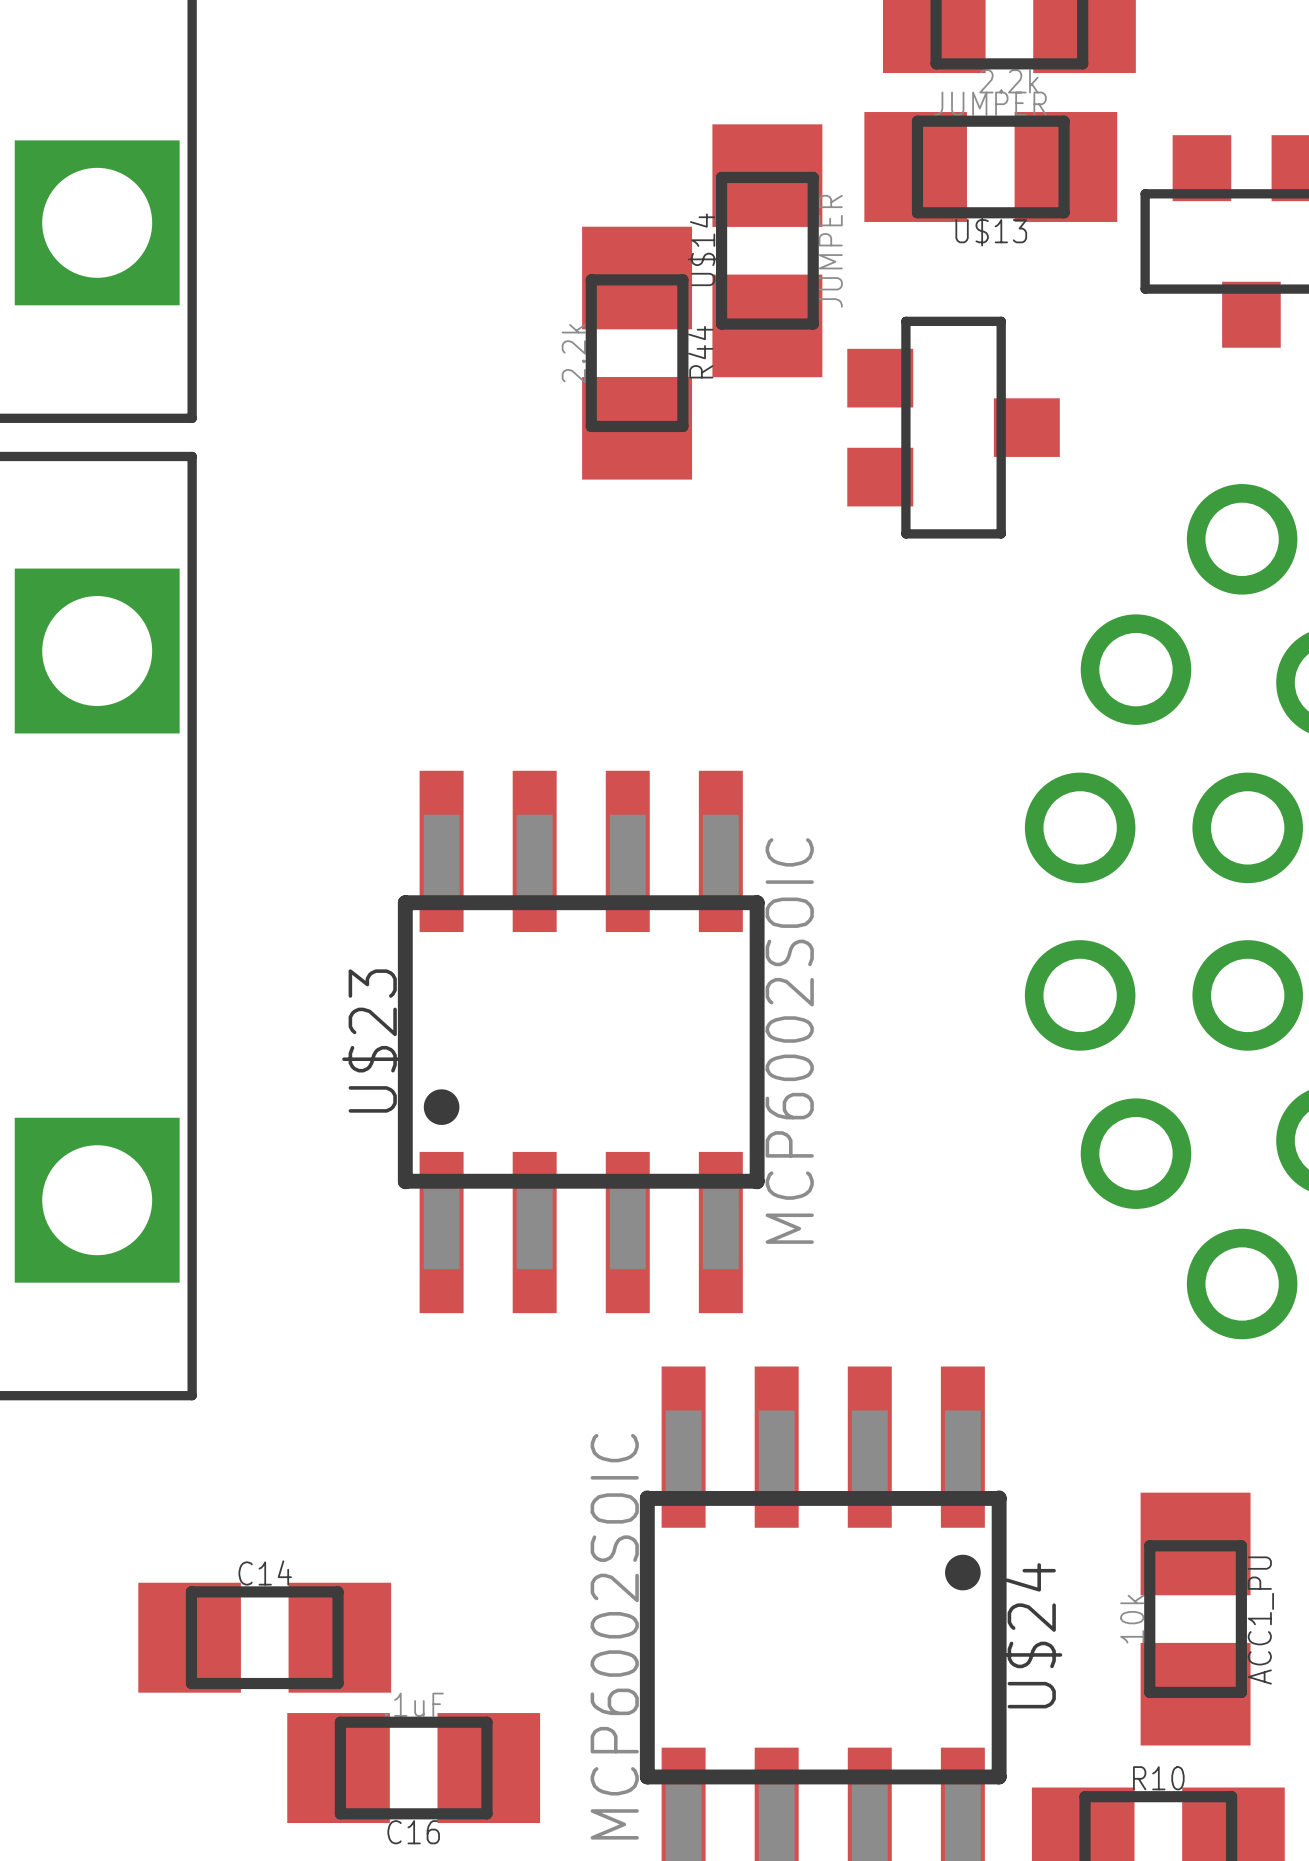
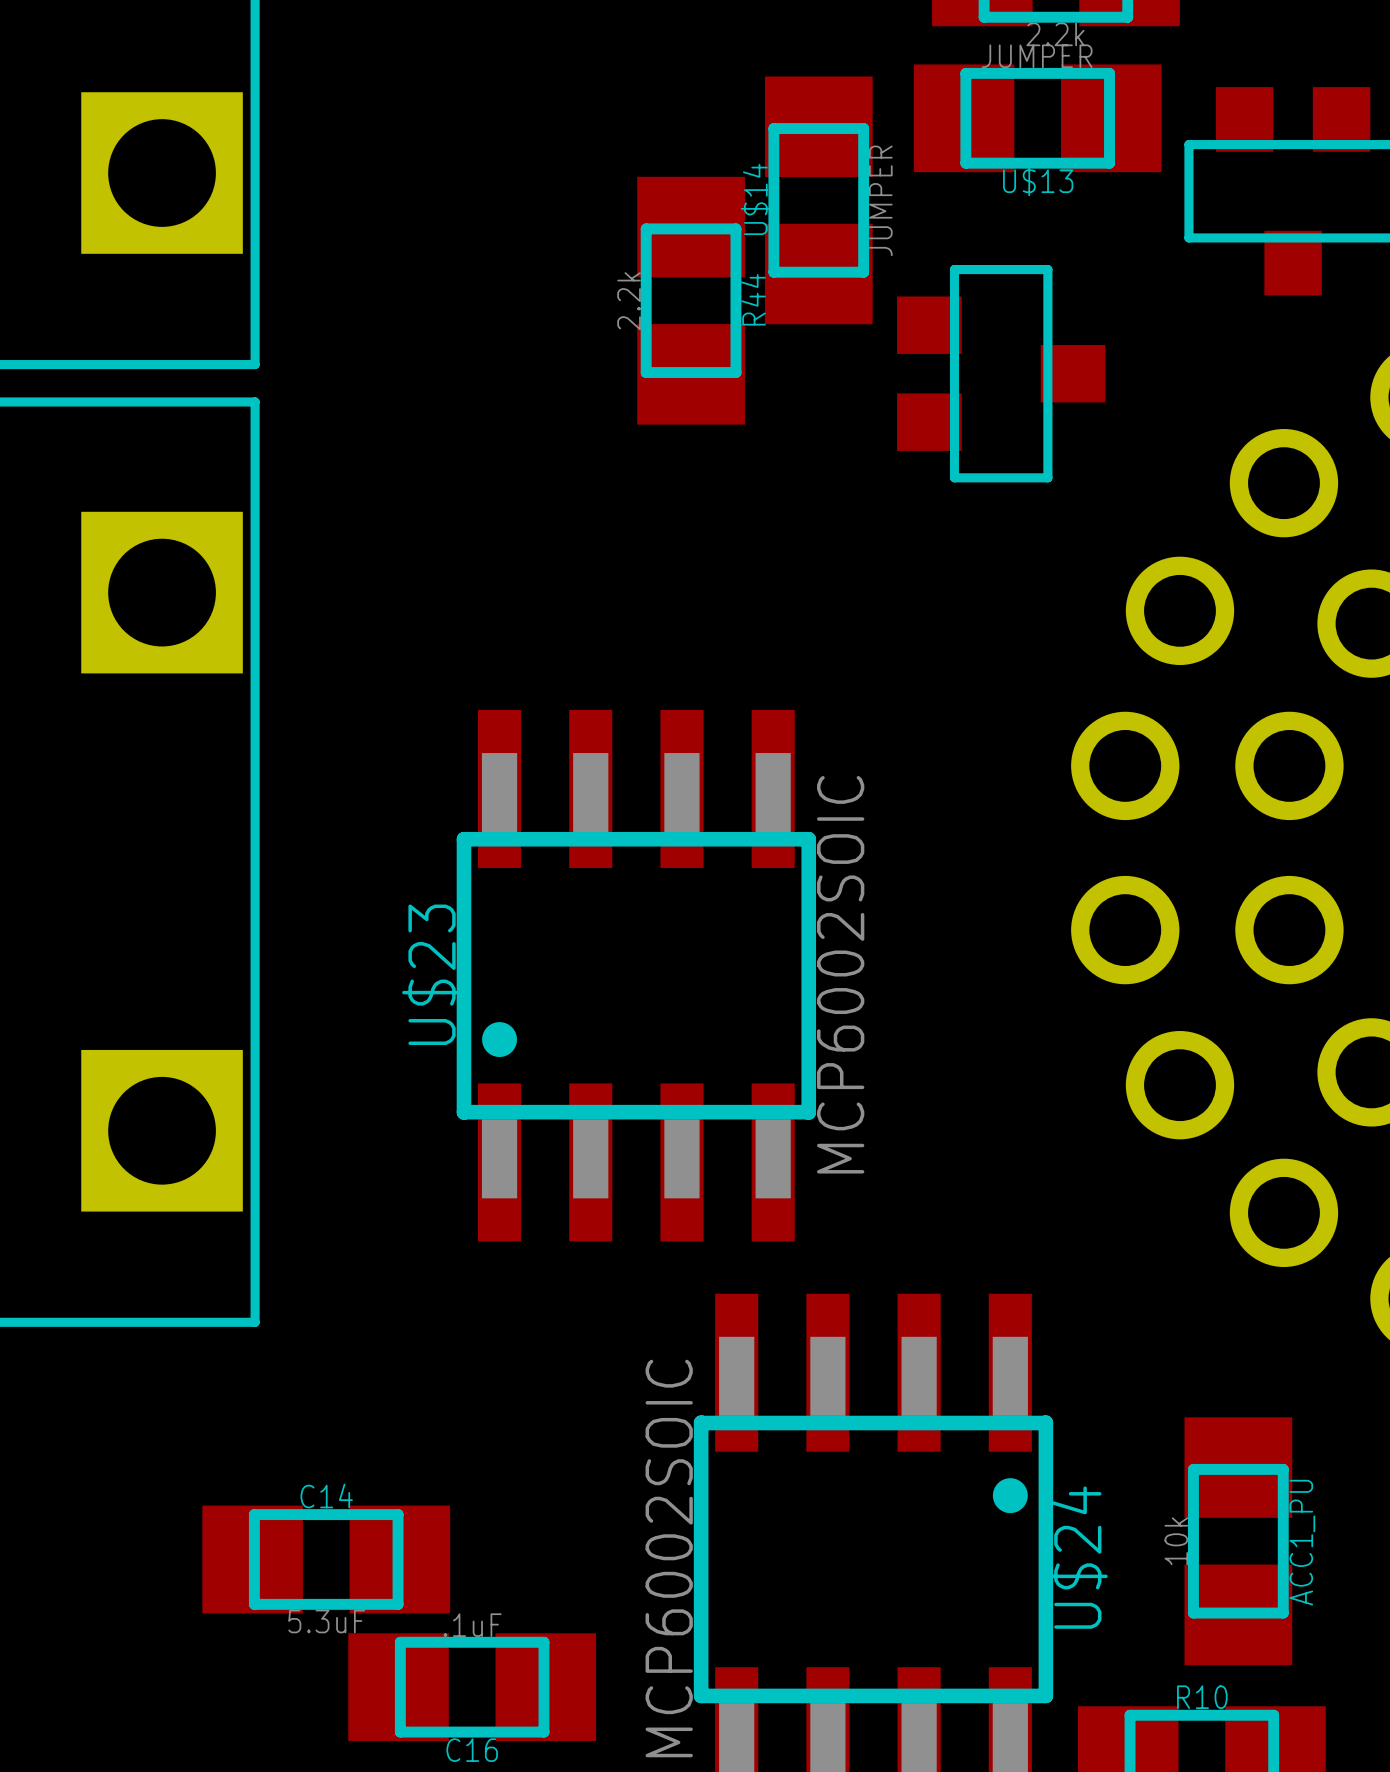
C14 value: none -> 5.3uF (326, 1621)

